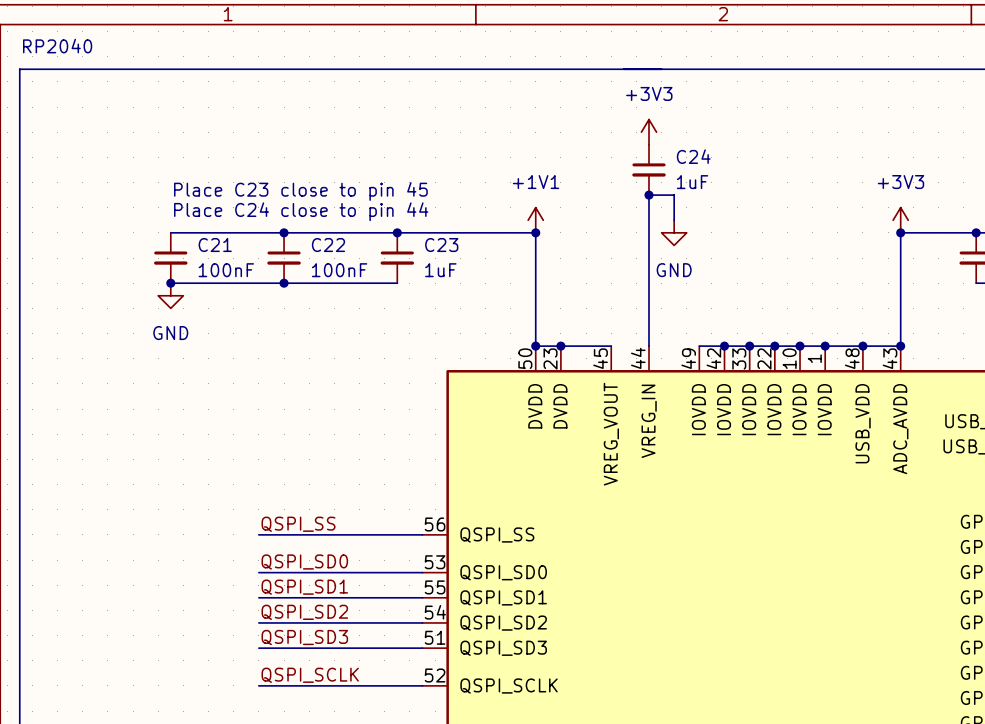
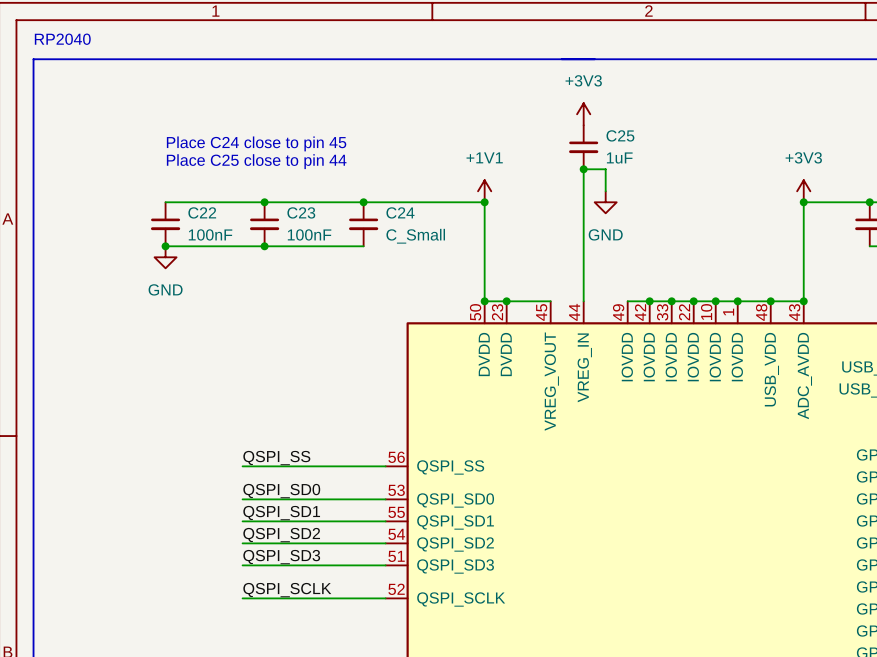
C24 name: C24 (693, 156) -> C25 (620, 135)
text: none -> Place C24 close to pin 45 (256, 143)
text: Place C23 close to pin 45 (300, 191) -> Place C25 close to pin 44 (256, 161)
text: Place C24 close to pin 44 (301, 211) -> none
C21 name: C21 (215, 245) -> C22 (202, 212)
C22 name: C22 (328, 245) -> C23 (301, 212)
C23 name: C23 (441, 245) -> C24 (400, 212)
C23 value: 1uF (440, 270) -> C_Small (415, 236)

